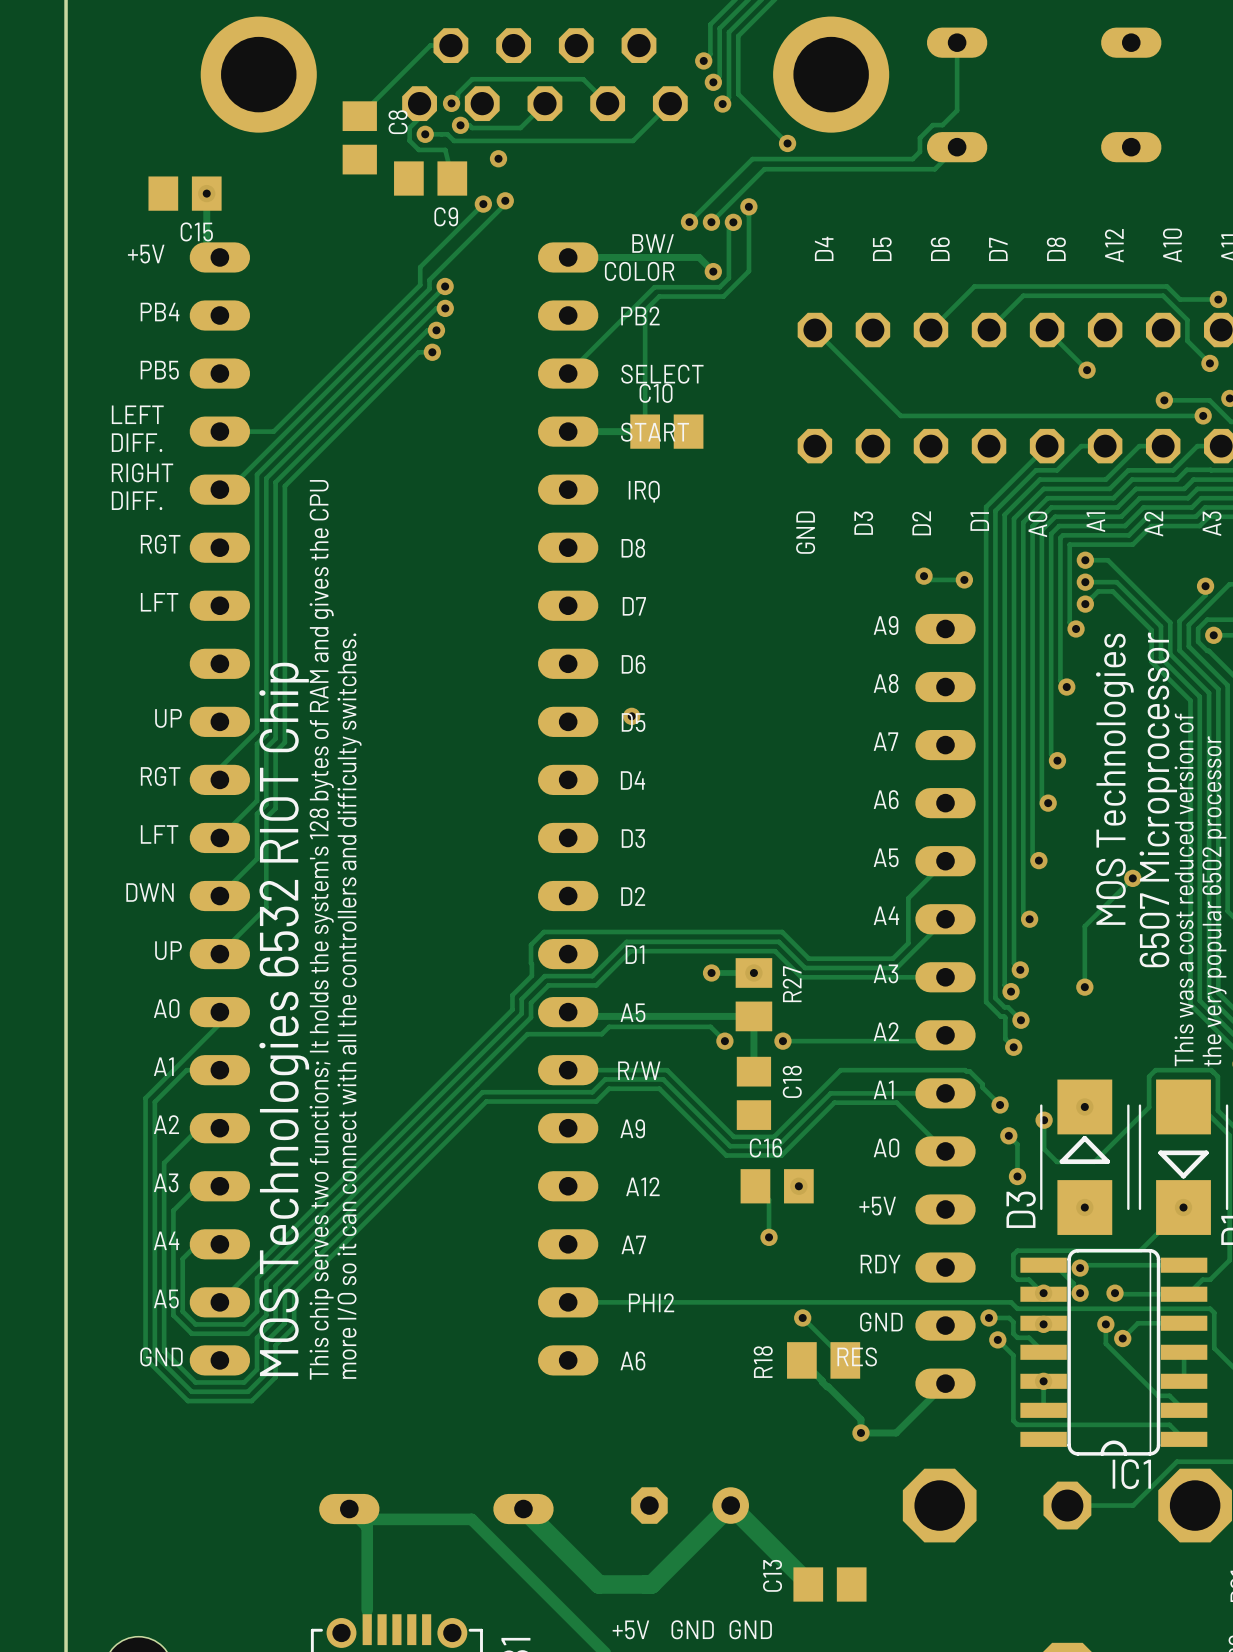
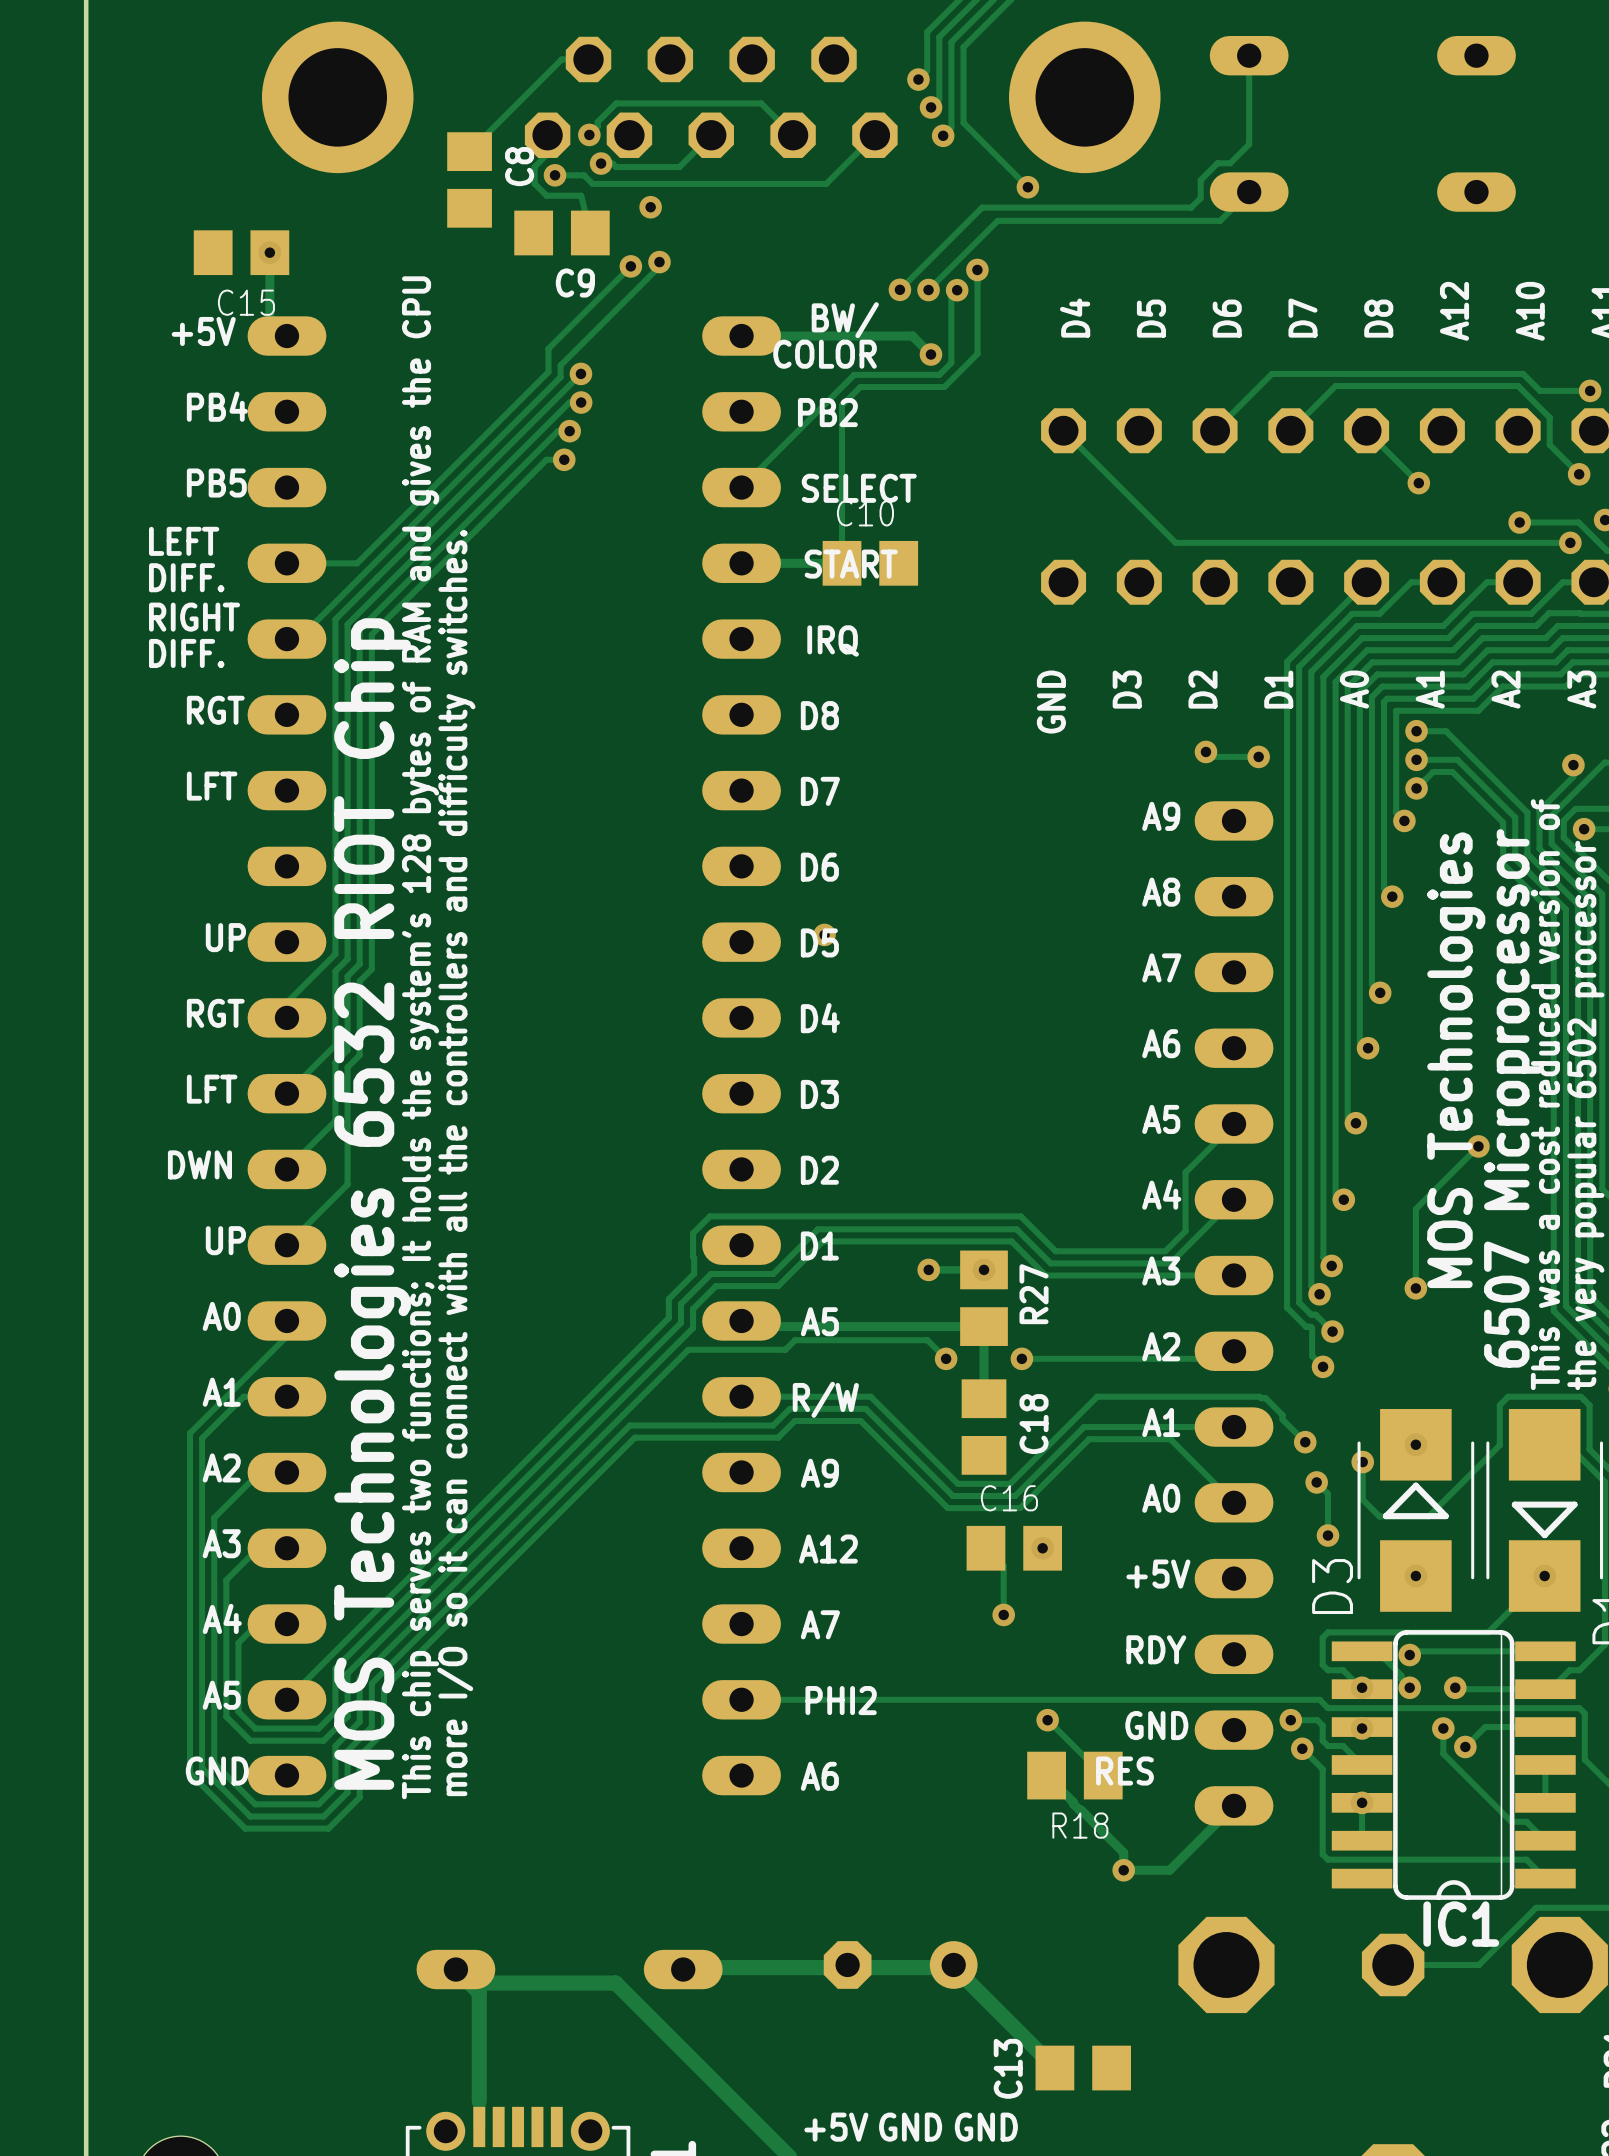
R18 name rotation: 0° (763, 1362) -> 90° clockwise (1080, 1825)
R18 name position: R18 (763, 1362) -> R18 (1080, 1825)
track: (730, 1505) (808, 1584) -> (685, 1967) (954, 1967) (1054, 2068)
track: (728, 1507) (651, 1584) (598, 1584) (523, 1509) -> none

